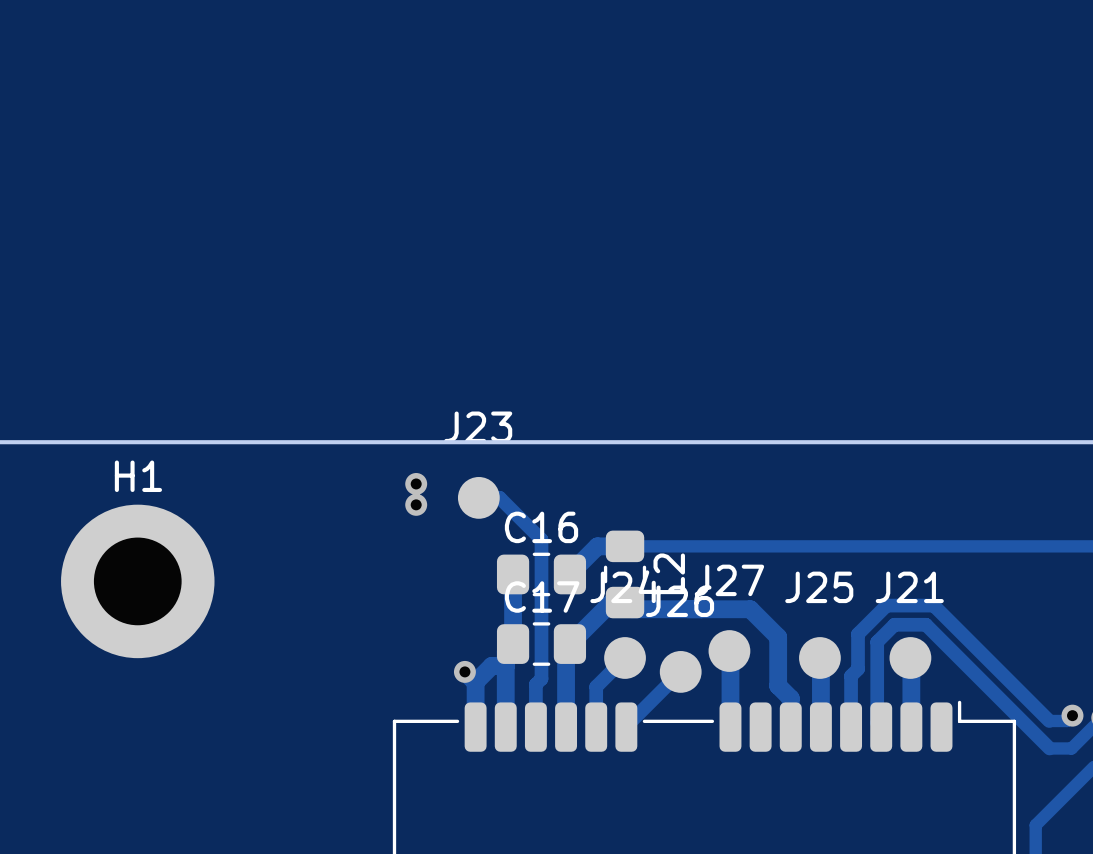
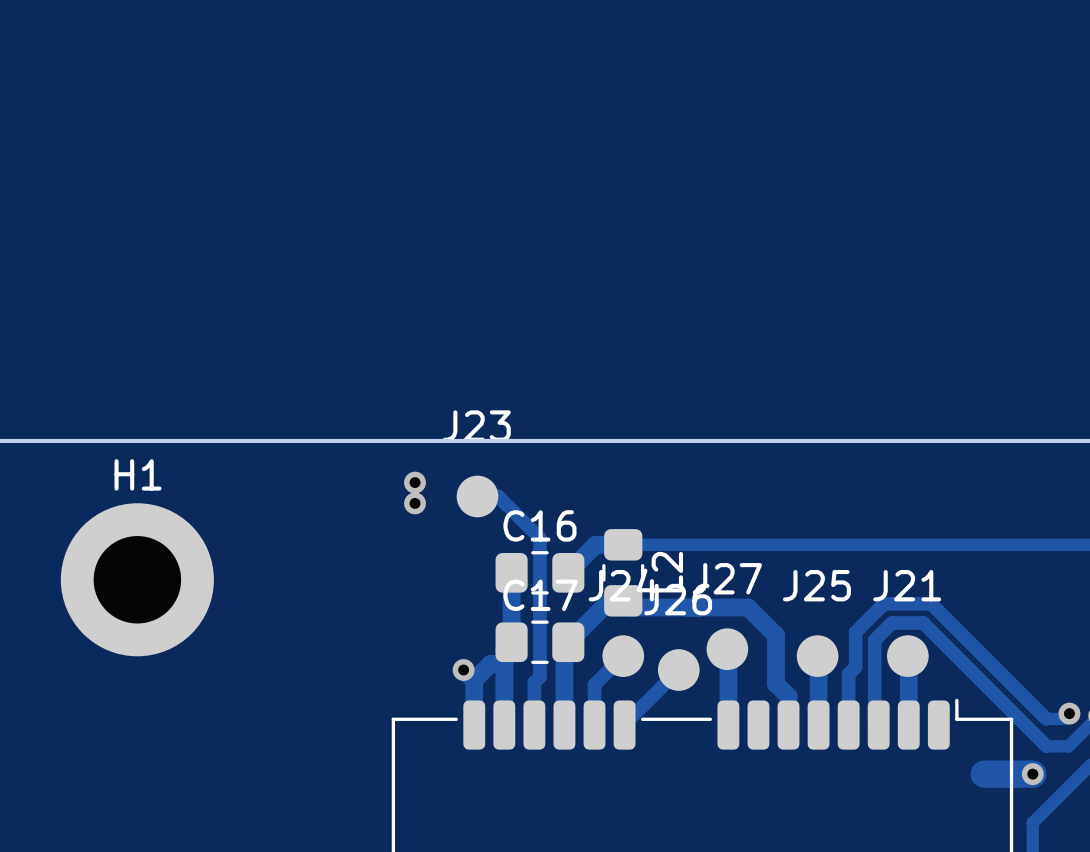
track: none -> (984, 774) (1032, 774)
via: none -> (1032, 774)

